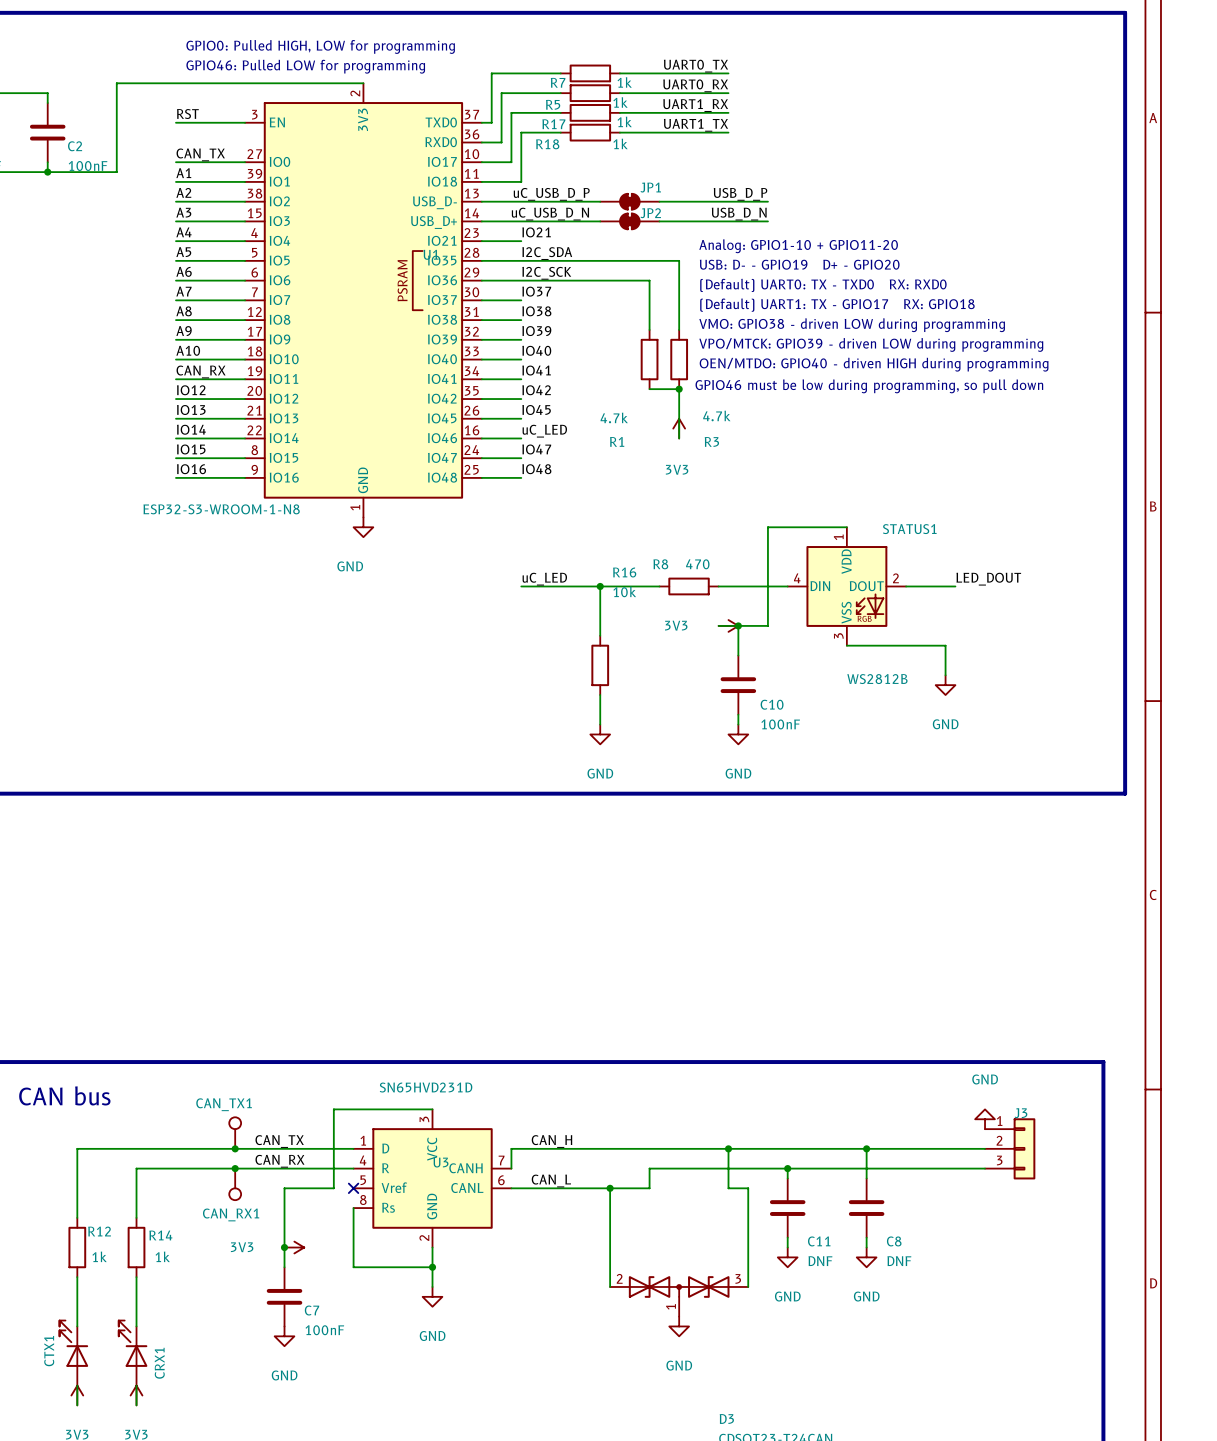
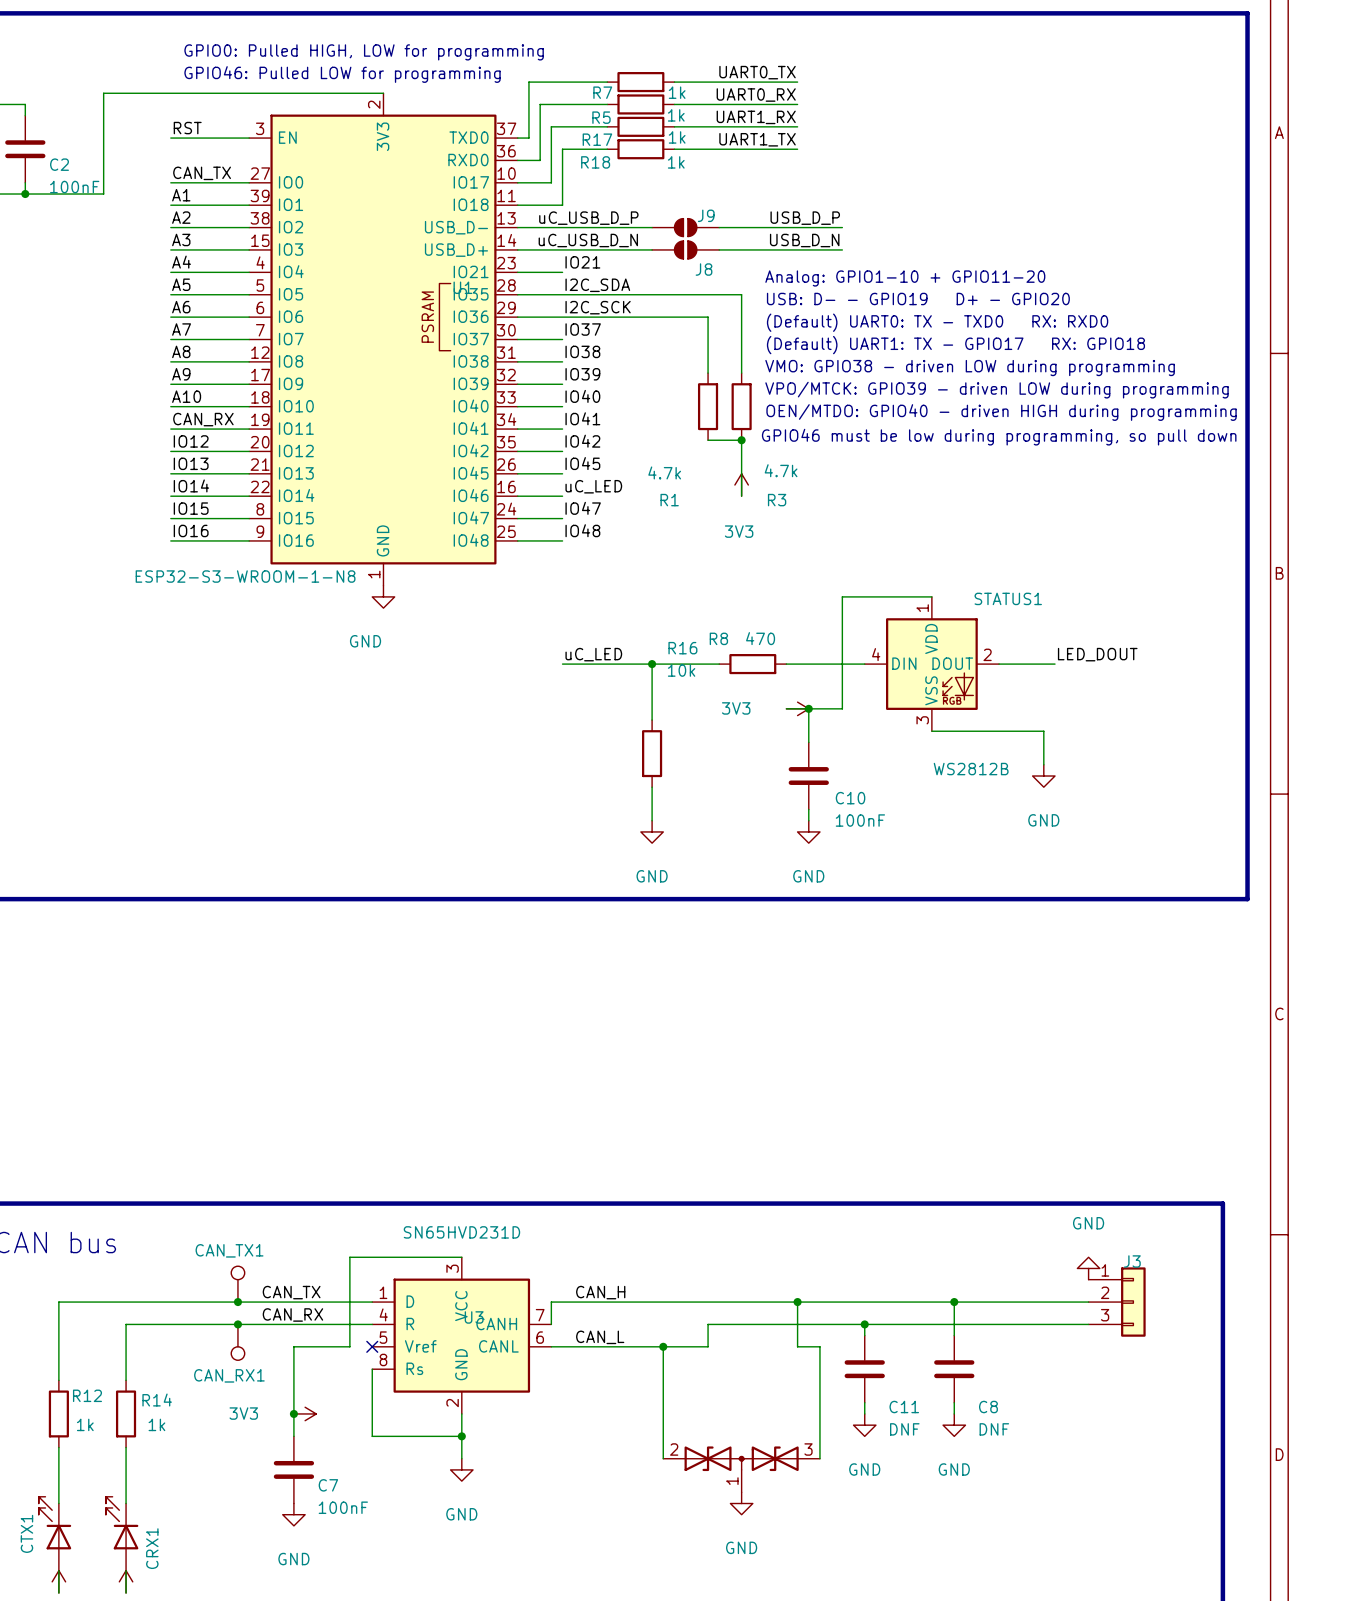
JP1: (629, 201) -> none
J9: none -> (685, 227)
JP2: (629, 221) -> none
J8: none -> (685, 249)

